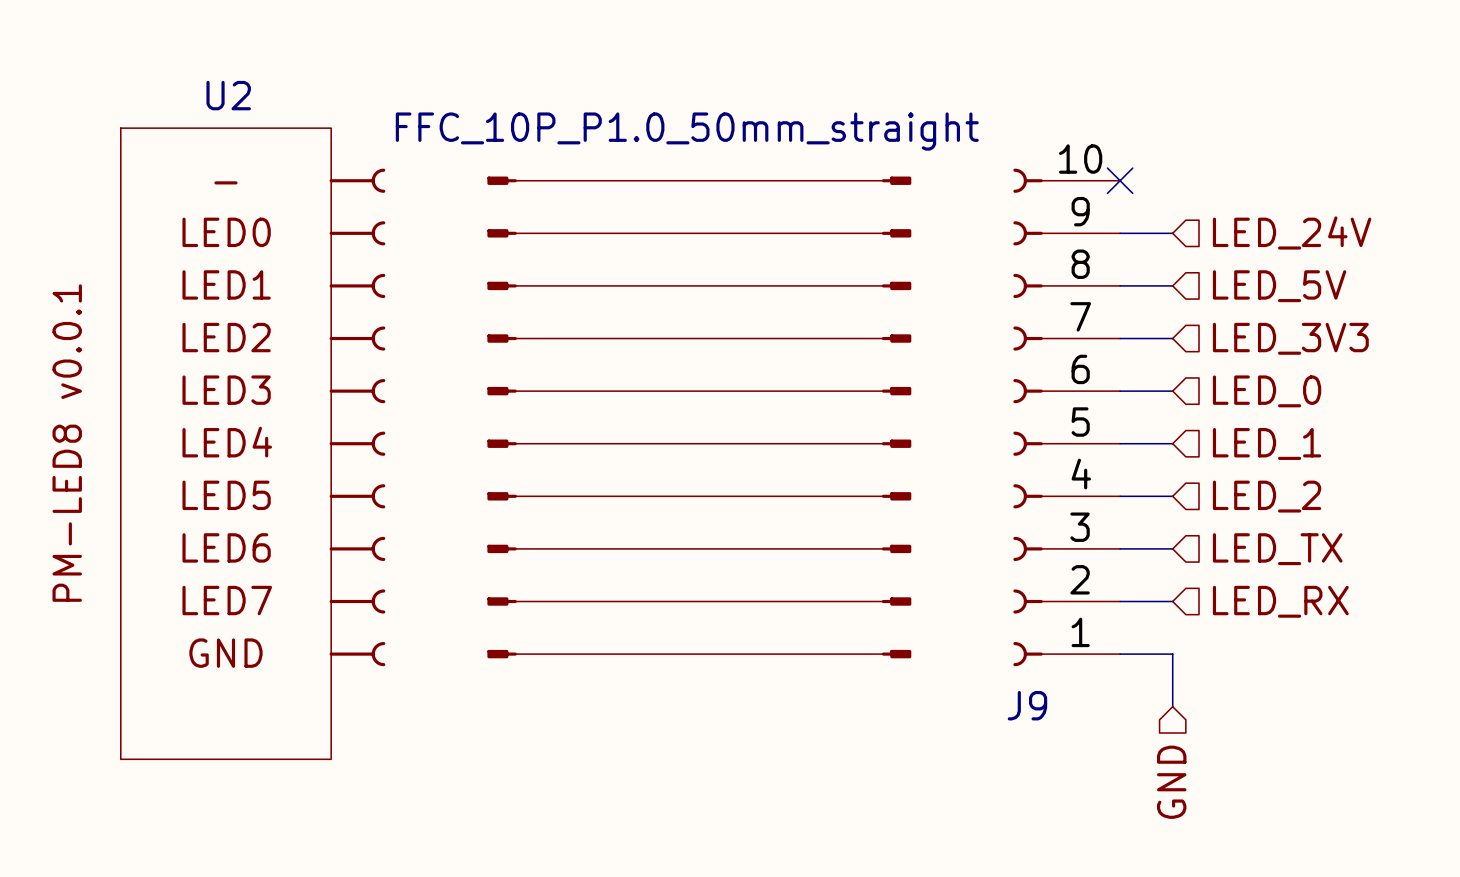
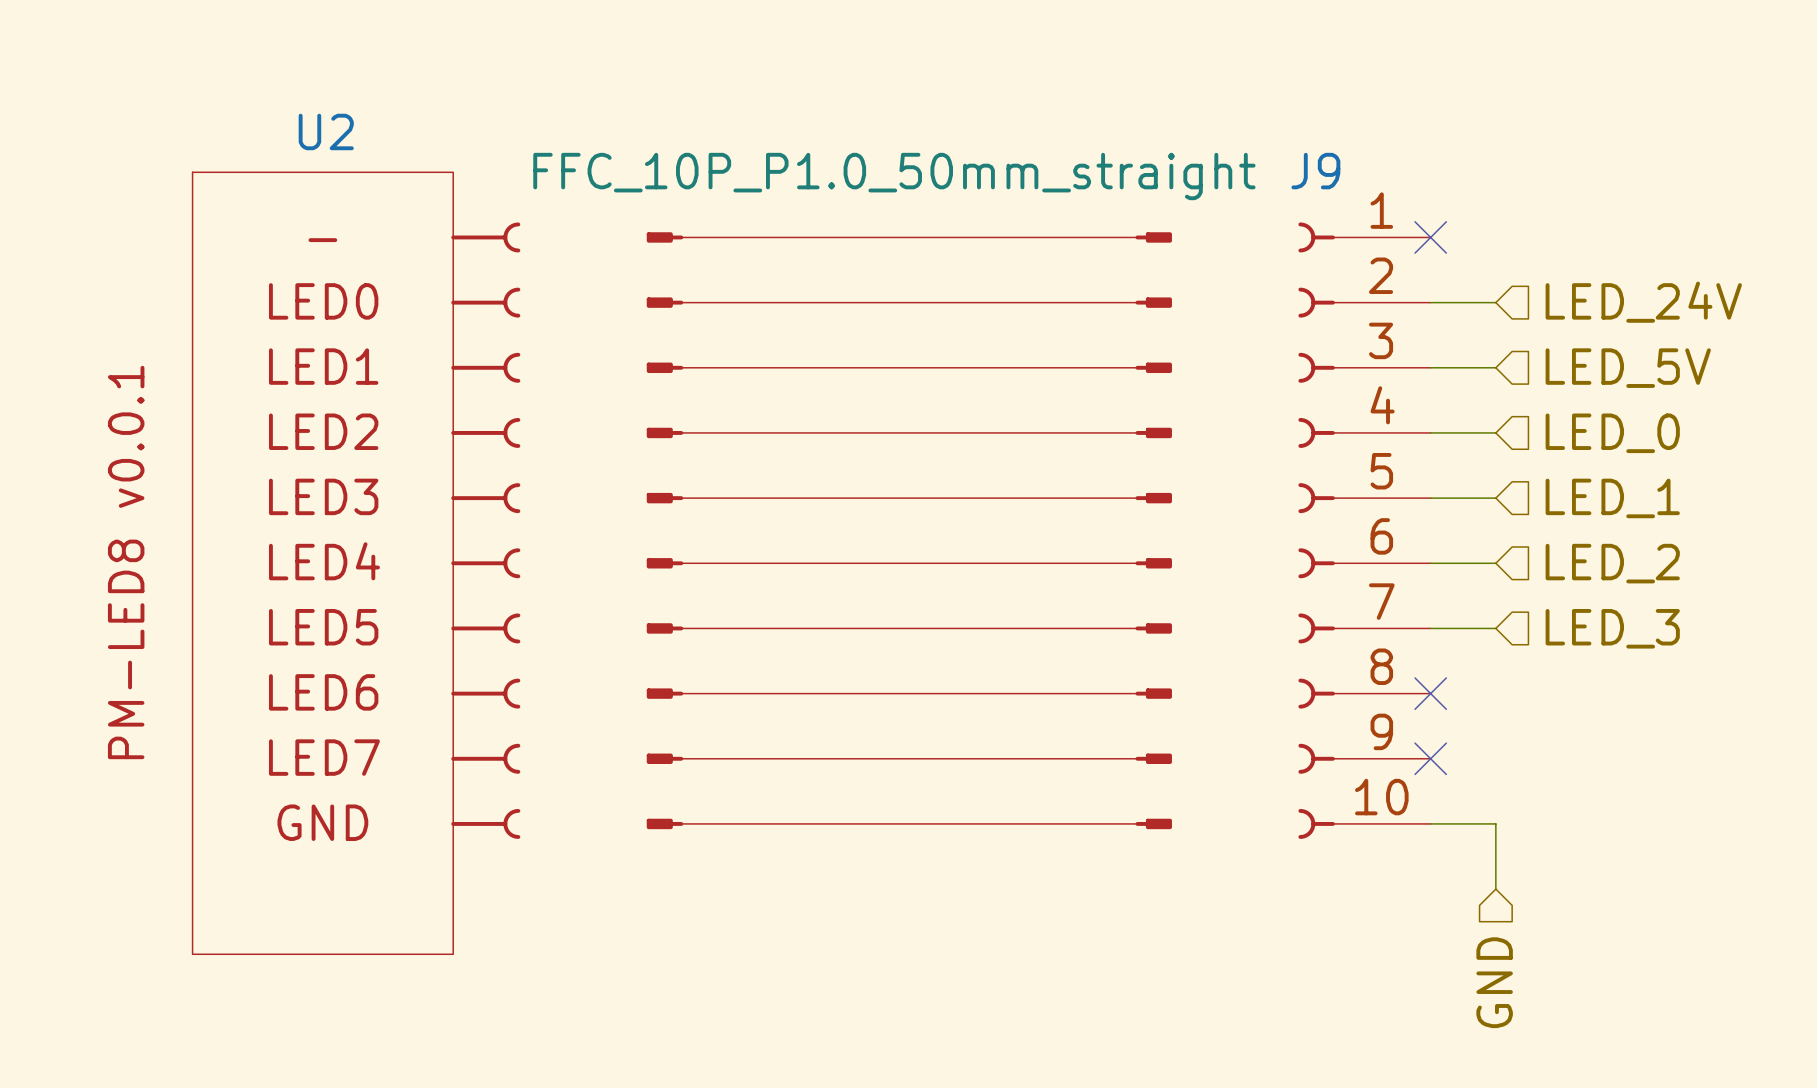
hierarchical label: LED_3V3 (1290, 338) -> LED_0 (1612, 433)
hierarchical label: LED_0 (1267, 391) -> LED_1 (1612, 498)
J9 flip: as is (1028, 417) -> up-down (1316, 530)
hierarchical label: LED_1 (1267, 443) -> LED_2 (1612, 563)
hierarchical label: LED_2 (1267, 496) -> LED_3 (1612, 628)
wire: (1120, 548) (1172, 548) -> none
no-connect mark: none -> (1430, 693)
hierarchical label: LED_TX (1277, 549) -> none
wire: (1120, 601) (1172, 601) -> none
no-connect mark: none -> (1430, 758)
hierarchical label: LED_RX (1280, 601) -> none

